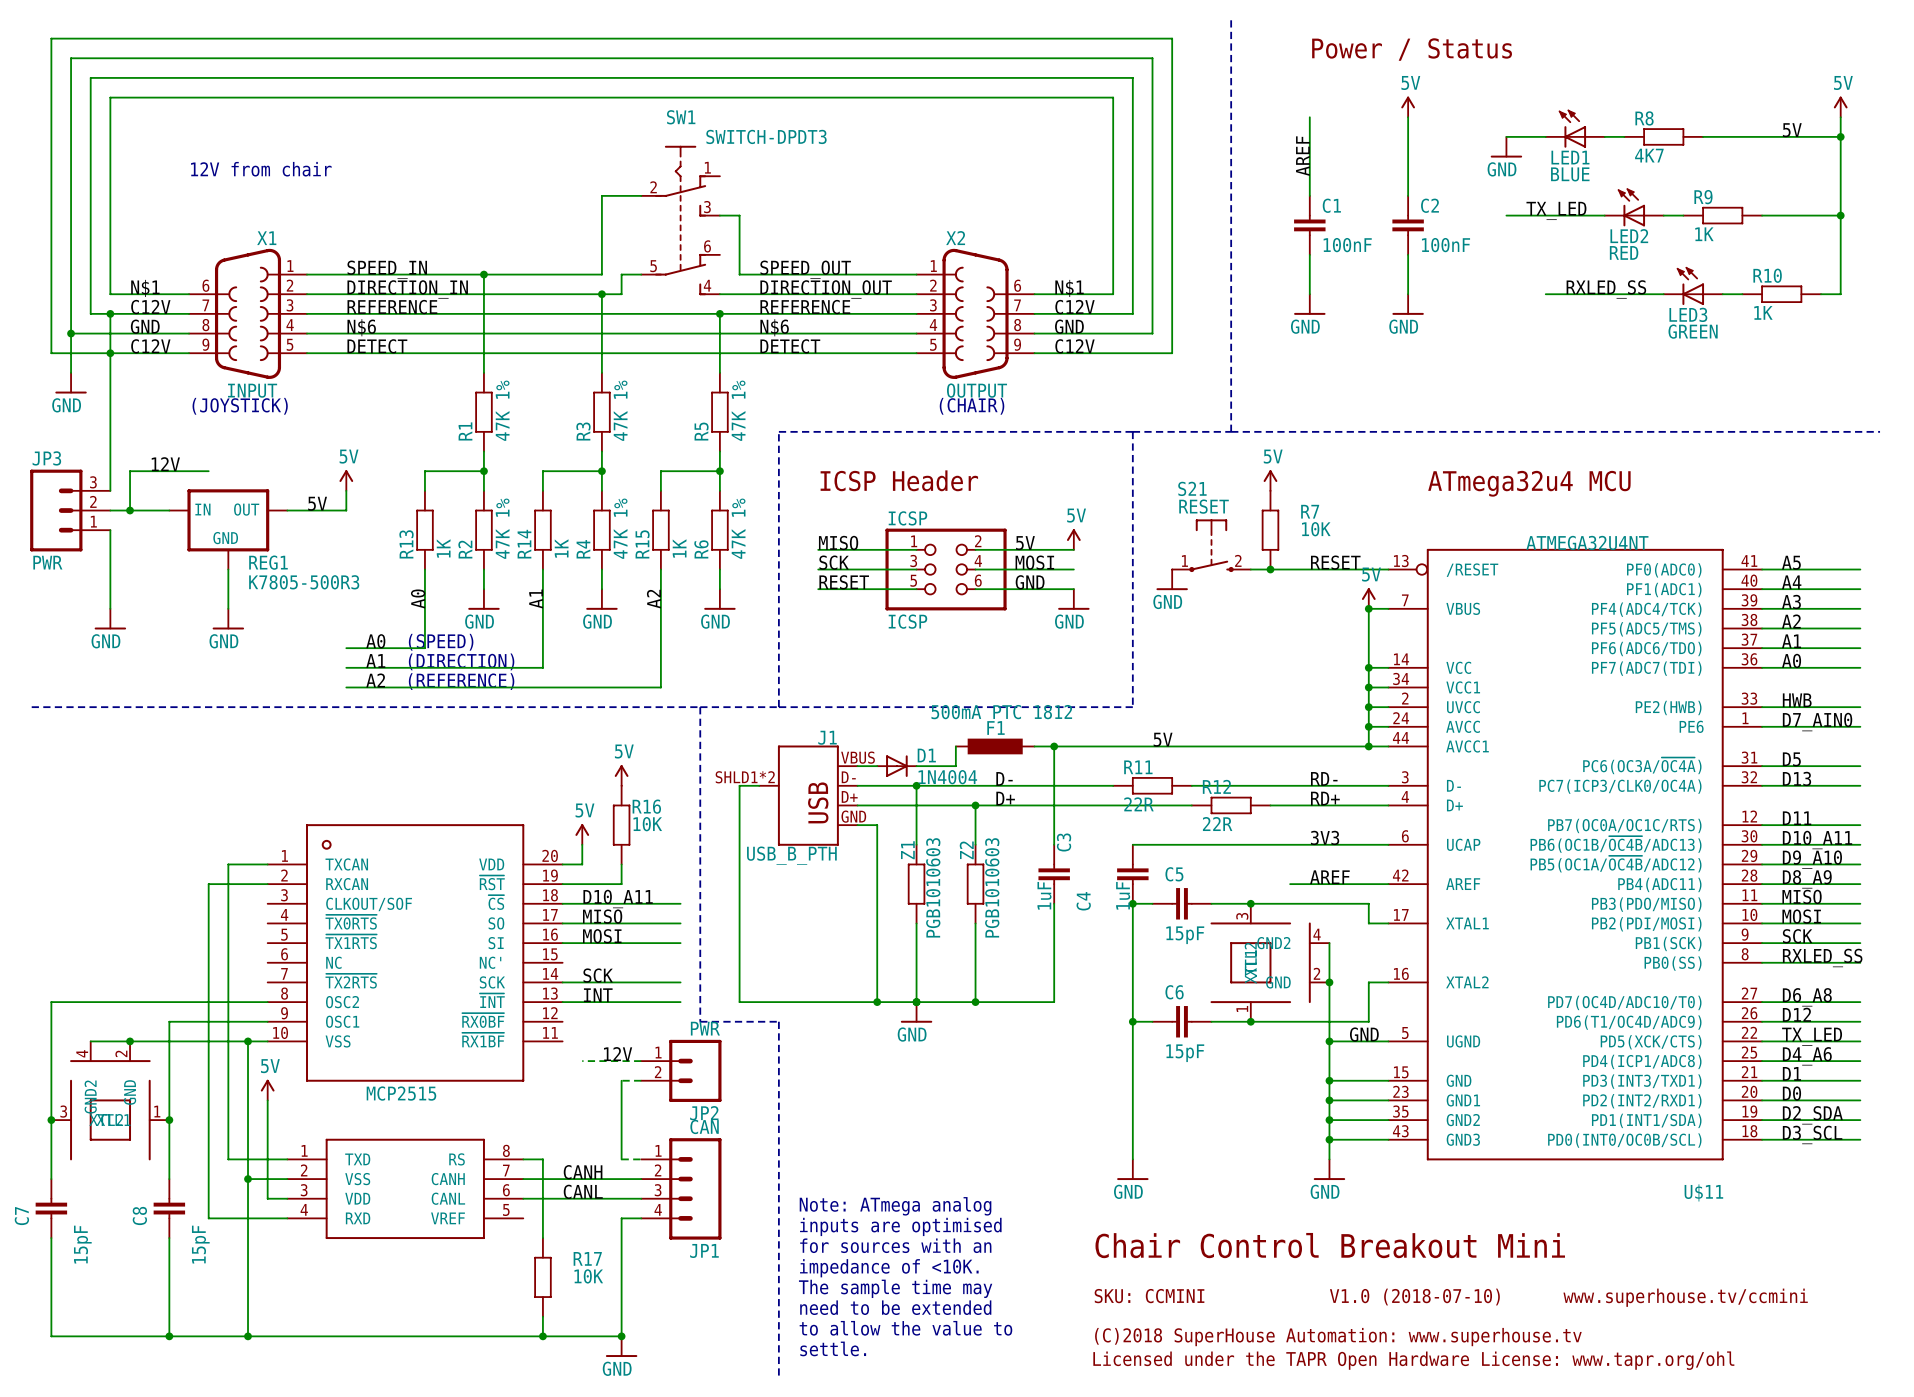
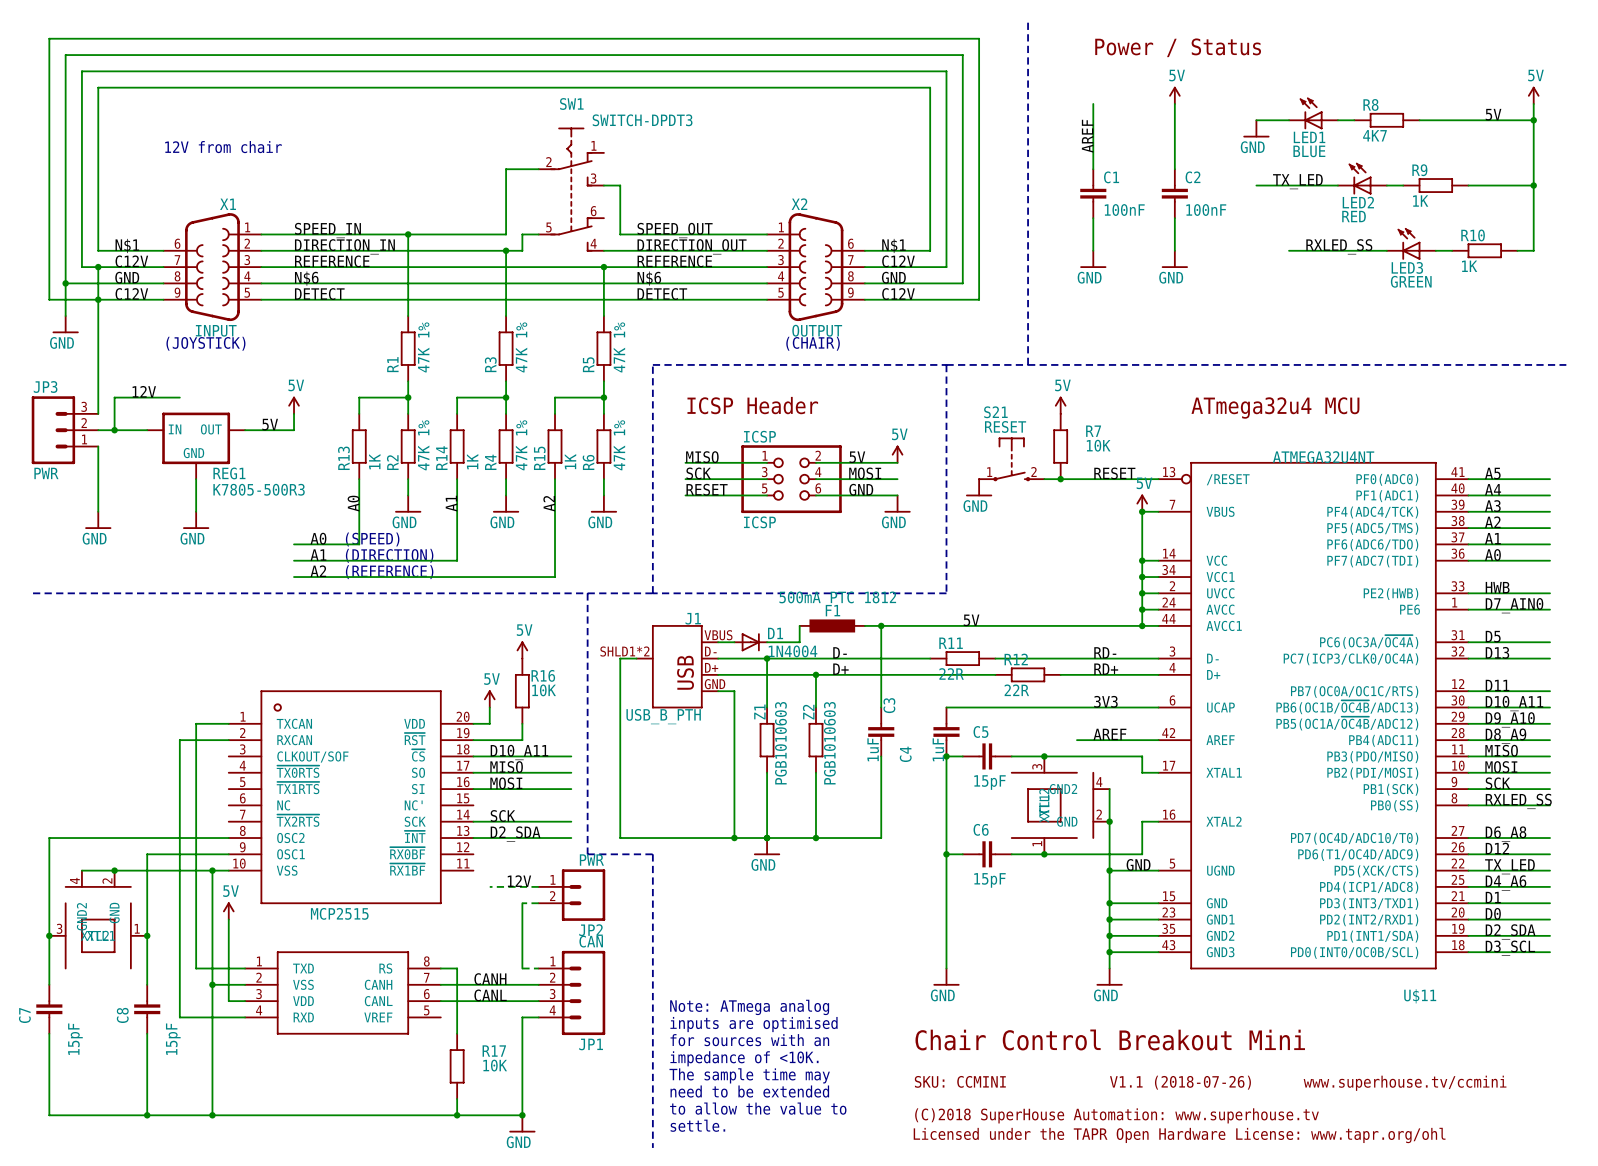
label: INT (598, 995) -> D2_SDA (515, 834)
text: V1.0 (2018-07-10) (1414, 1297) -> V1.1 (2018-07-26) (1180, 1082)

